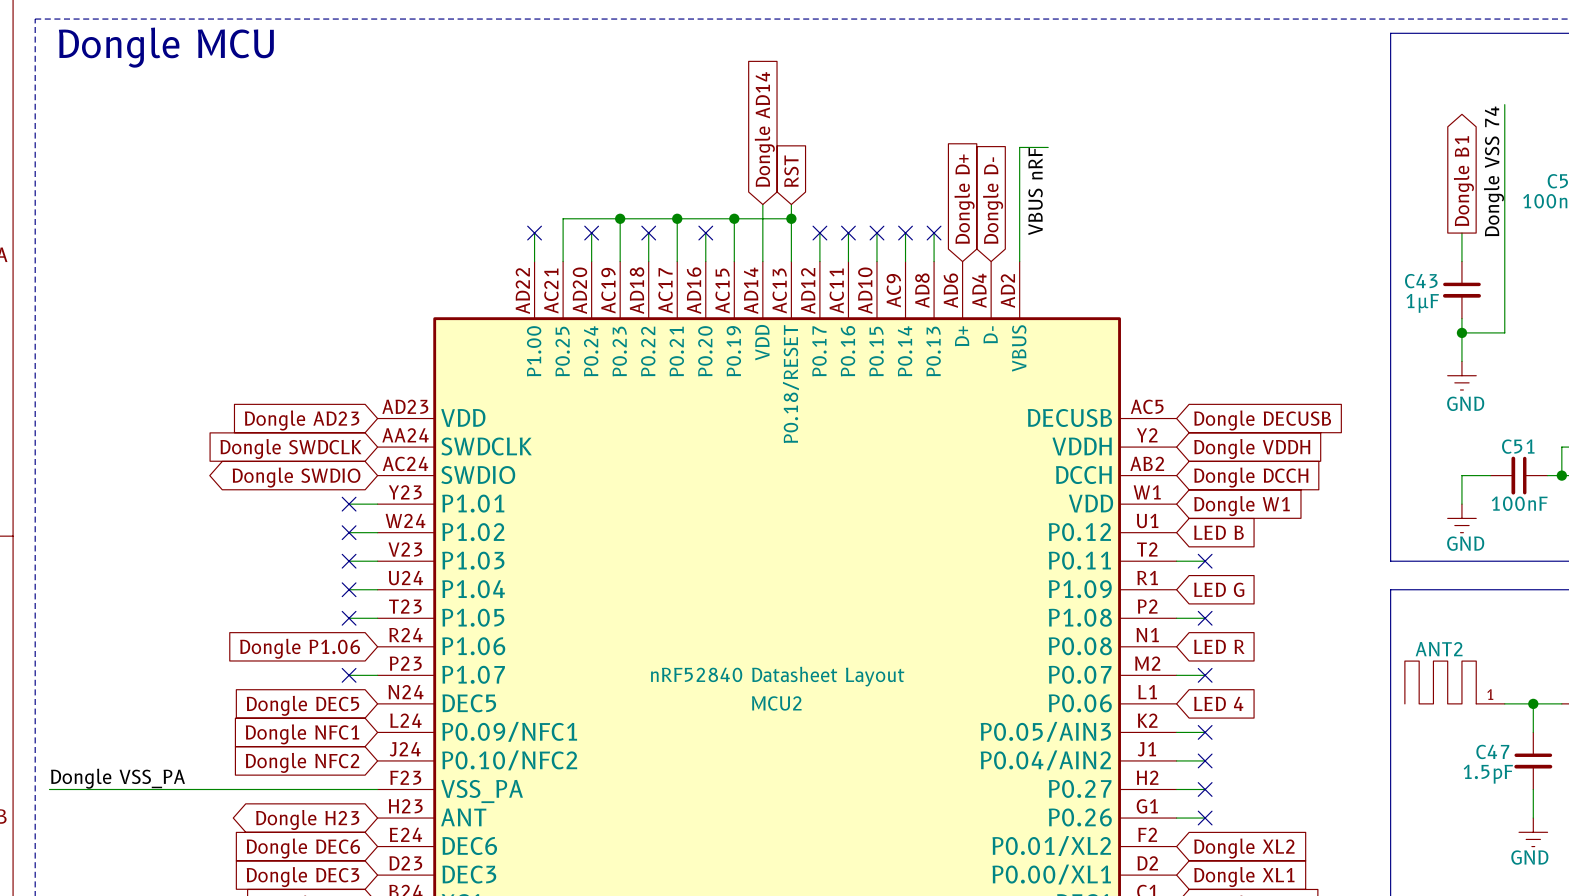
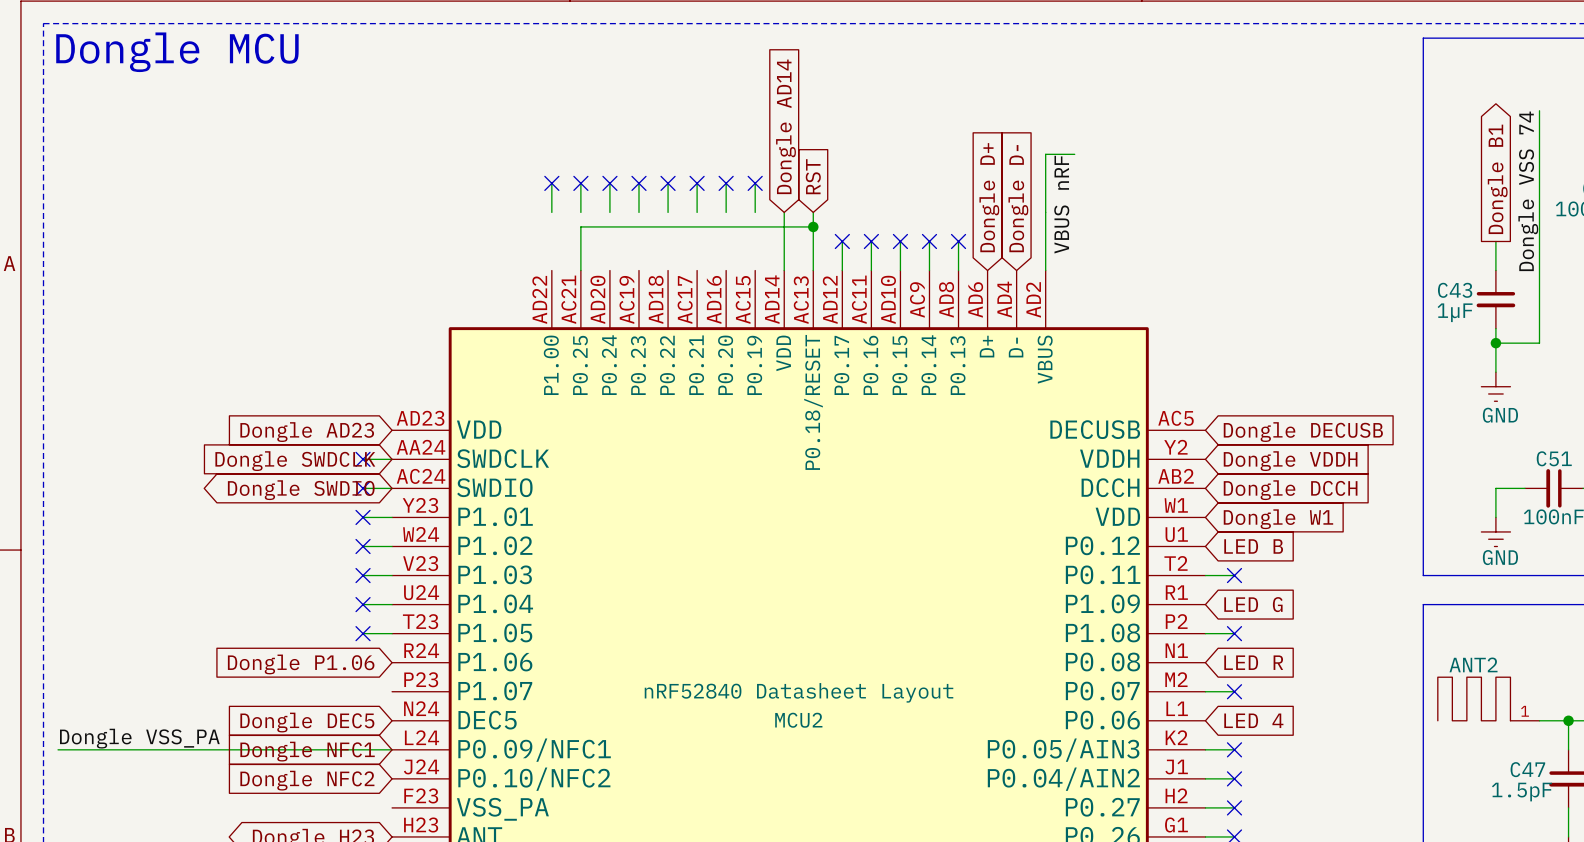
no-connect mark: none -> (551, 183)
wire: none -> (580, 183) (580, 212)
no-connect mark: none -> (580, 183)
no-connect mark: none -> (609, 183)
wire: none -> (638, 183) (638, 212)
no-connect mark: none -> (638, 183)
no-connect mark: none -> (668, 183)
wire: none -> (697, 183) (697, 212)
no-connect mark: none -> (697, 183)
no-connect mark: none -> (726, 183)
wire: none -> (755, 183) (755, 212)
no-connect mark: none -> (755, 183)
wire: (620, 218) (620, 261) -> none
junction: (620, 218) -> none
wire: (677, 218) (677, 261) -> none
junction: (677, 218) -> none
wire: (734, 218) (734, 261) -> none
junction: (734, 218) -> none
wire: (534, 233) (534, 261) -> (551, 183) (551, 212)
no-connect mark: (534, 233) -> none
wire: (591, 233) (591, 261) -> (609, 183) (609, 212)
no-connect mark: (591, 233) -> none
wire: (648, 233) (648, 261) -> (668, 183) (668, 212)
no-connect mark: (648, 233) -> none
wire: (705, 233) (705, 261) -> (726, 183) (726, 212)
no-connect mark: (705, 233) -> none
wire: none -> (363, 459) (392, 459)
no-connect mark: none -> (363, 459)
no-connect mark: none -> (363, 488)
wire: (349, 675) (377, 675) -> (363, 488) (392, 488)
no-connect mark: (349, 675) -> none
label position: Dongle VSS_PA (118, 778) -> Dongle VSS_PA (139, 738)
wire: (49, 789) (377, 789) -> (58, 749) (392, 749)

